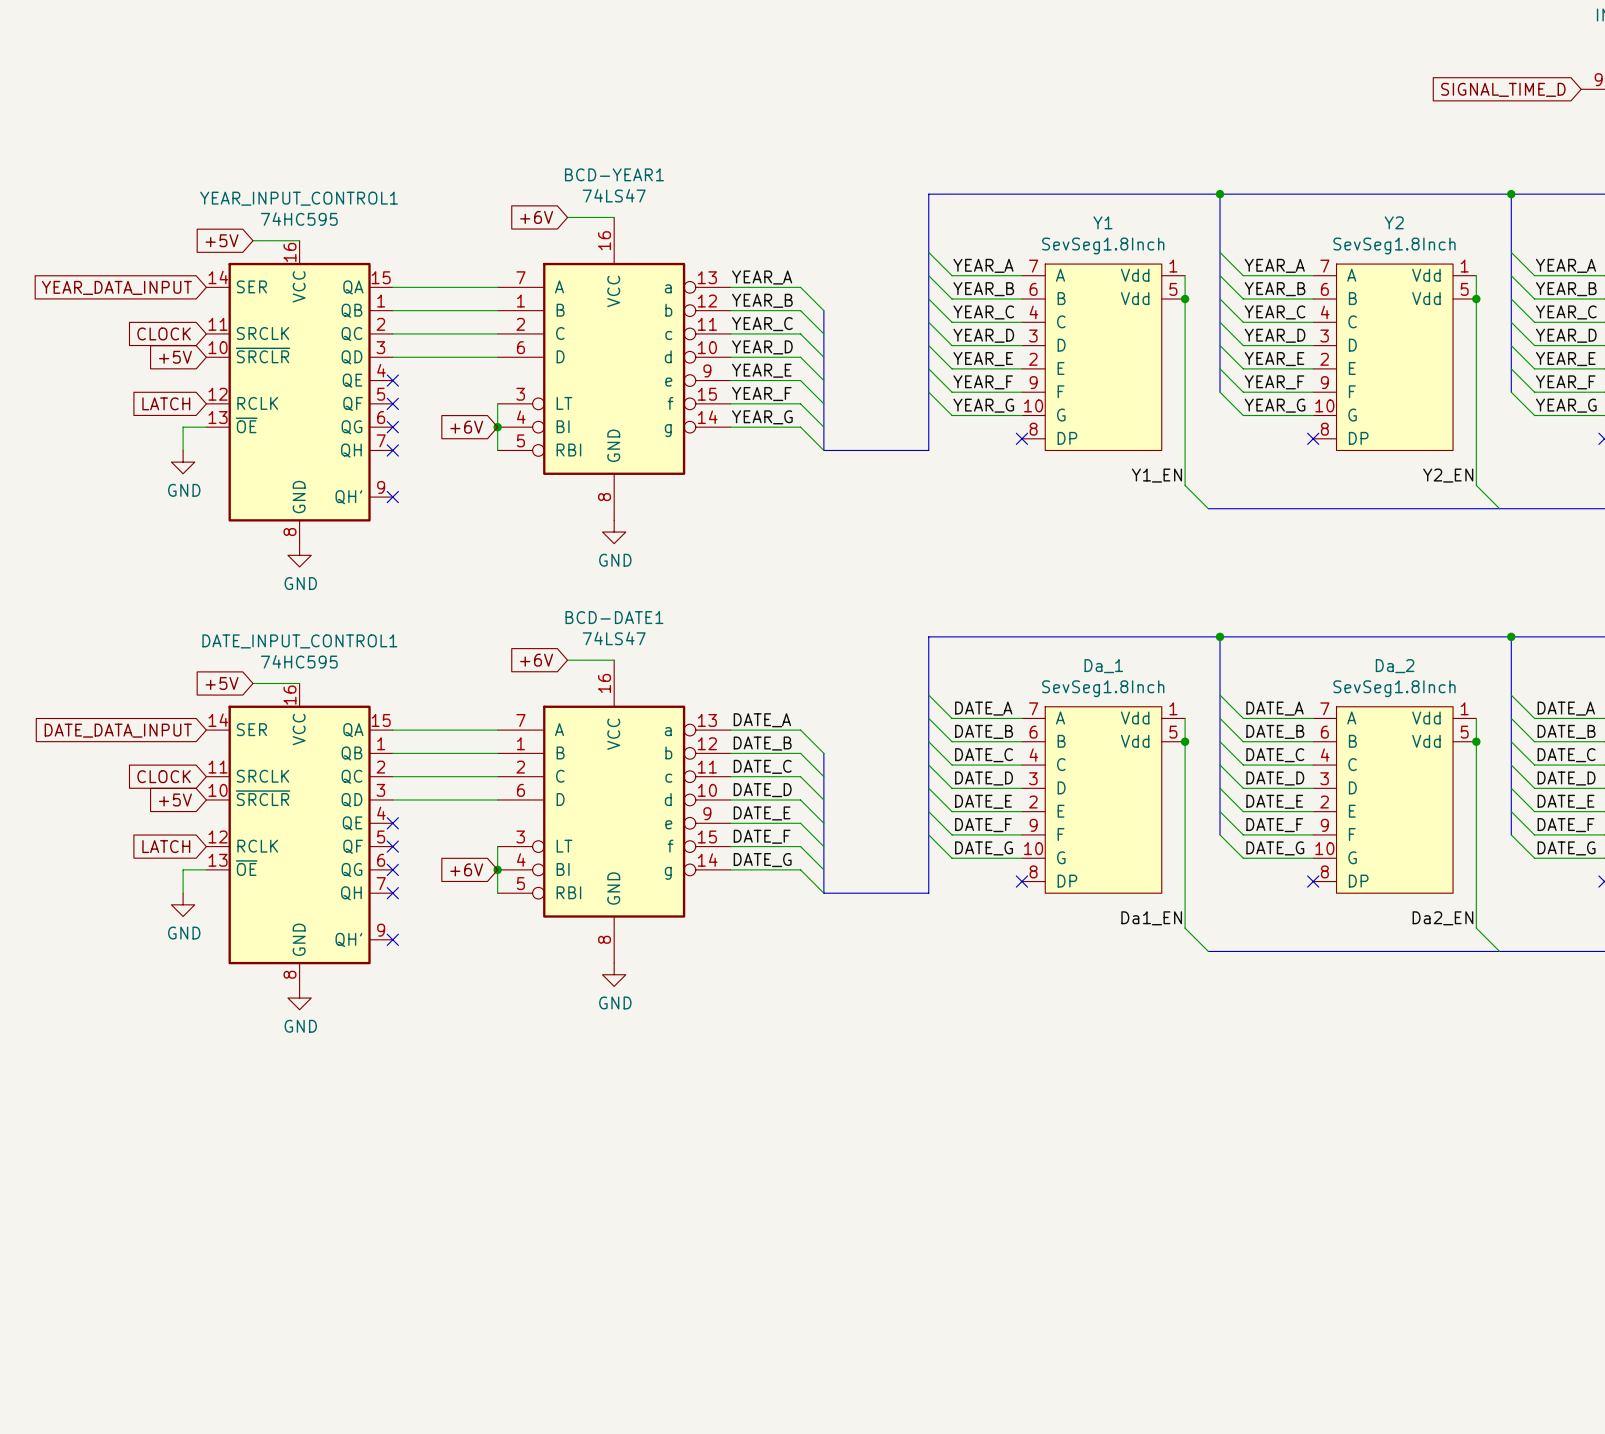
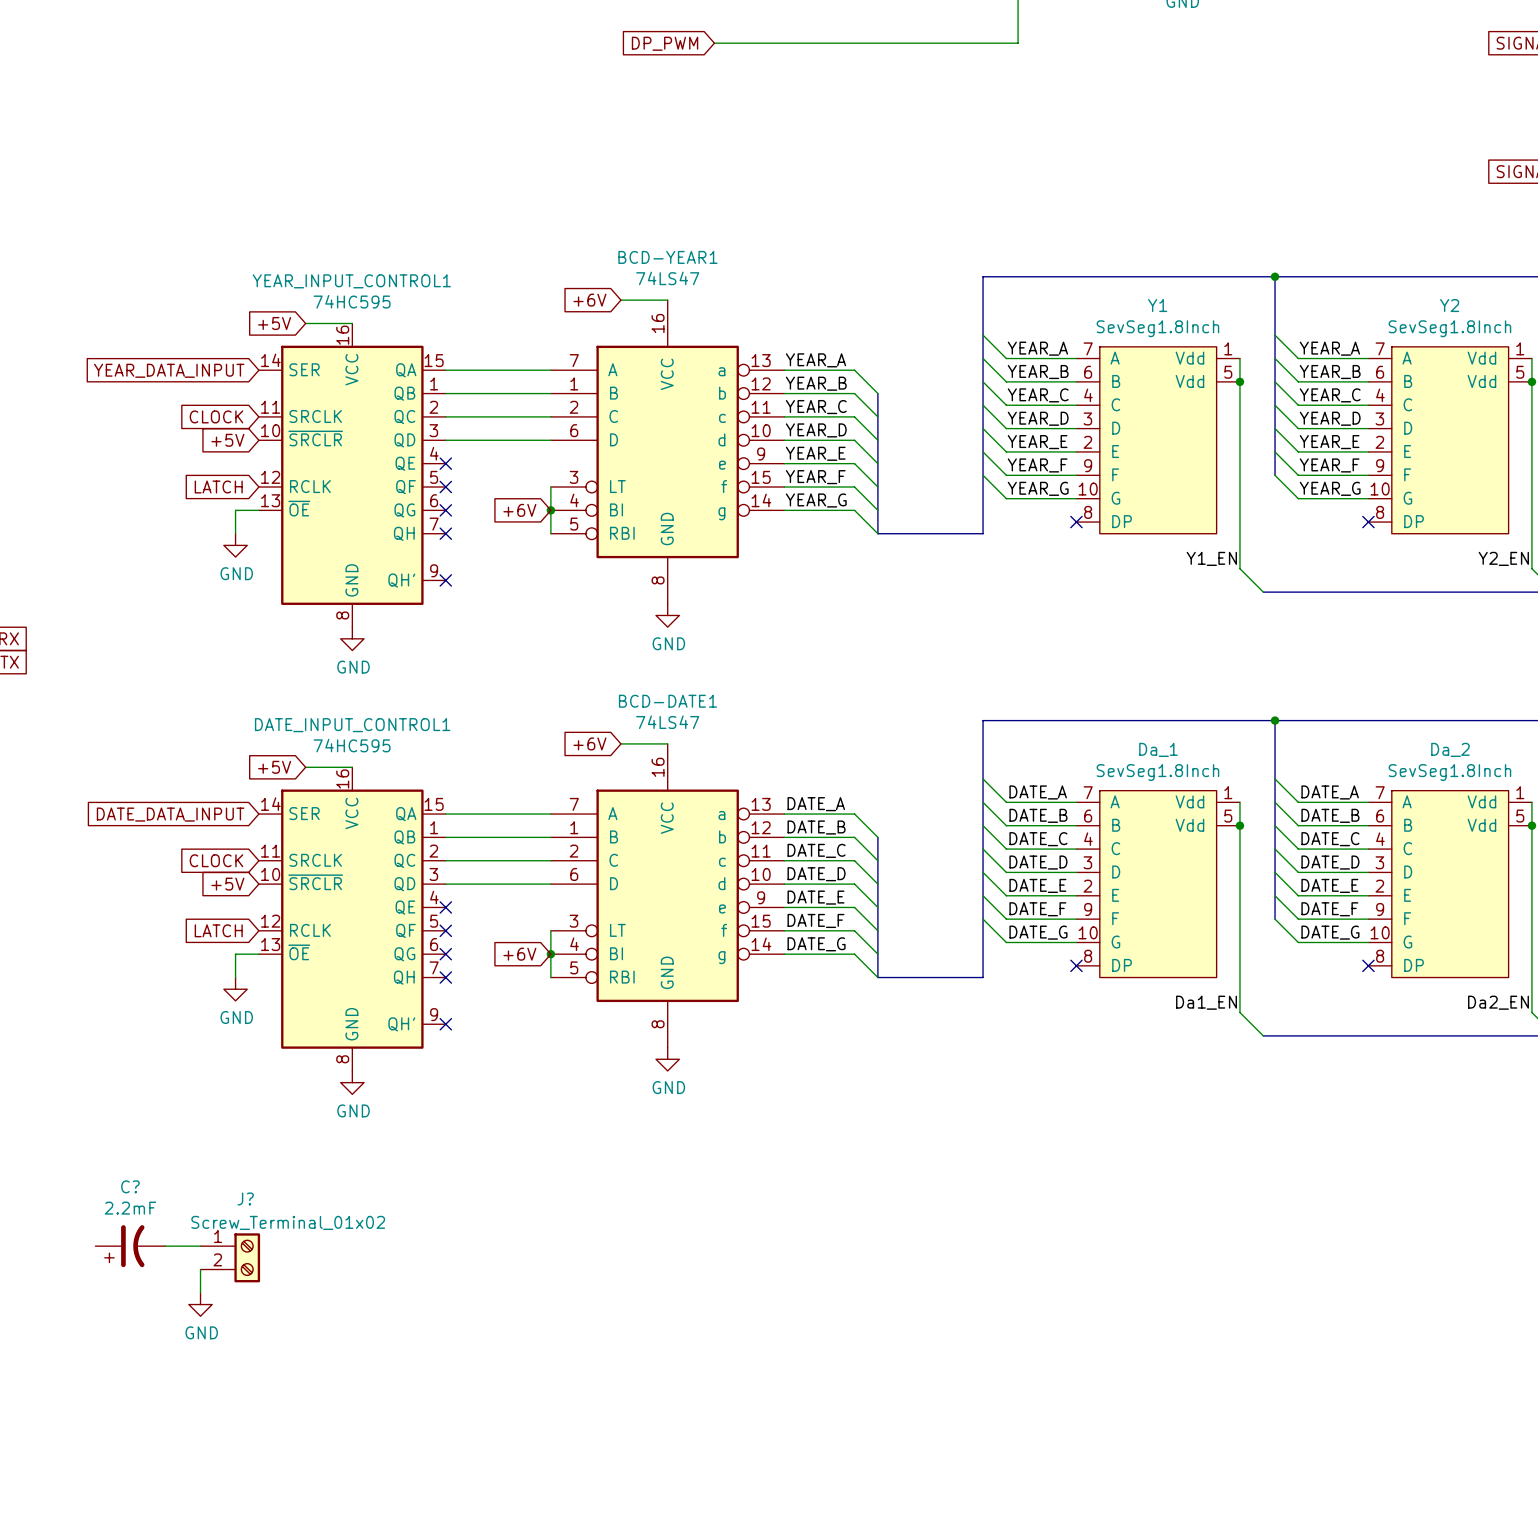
C?: none -> 2.2mF (130, 1246)
wire: none -> (165, 1246) (200, 1246)
J?: none -> Screw_Terminal_01x02 (230, 1257)
wire: none -> (200, 1269) (200, 1292)
power symbol: none -> GND (200, 1304)

